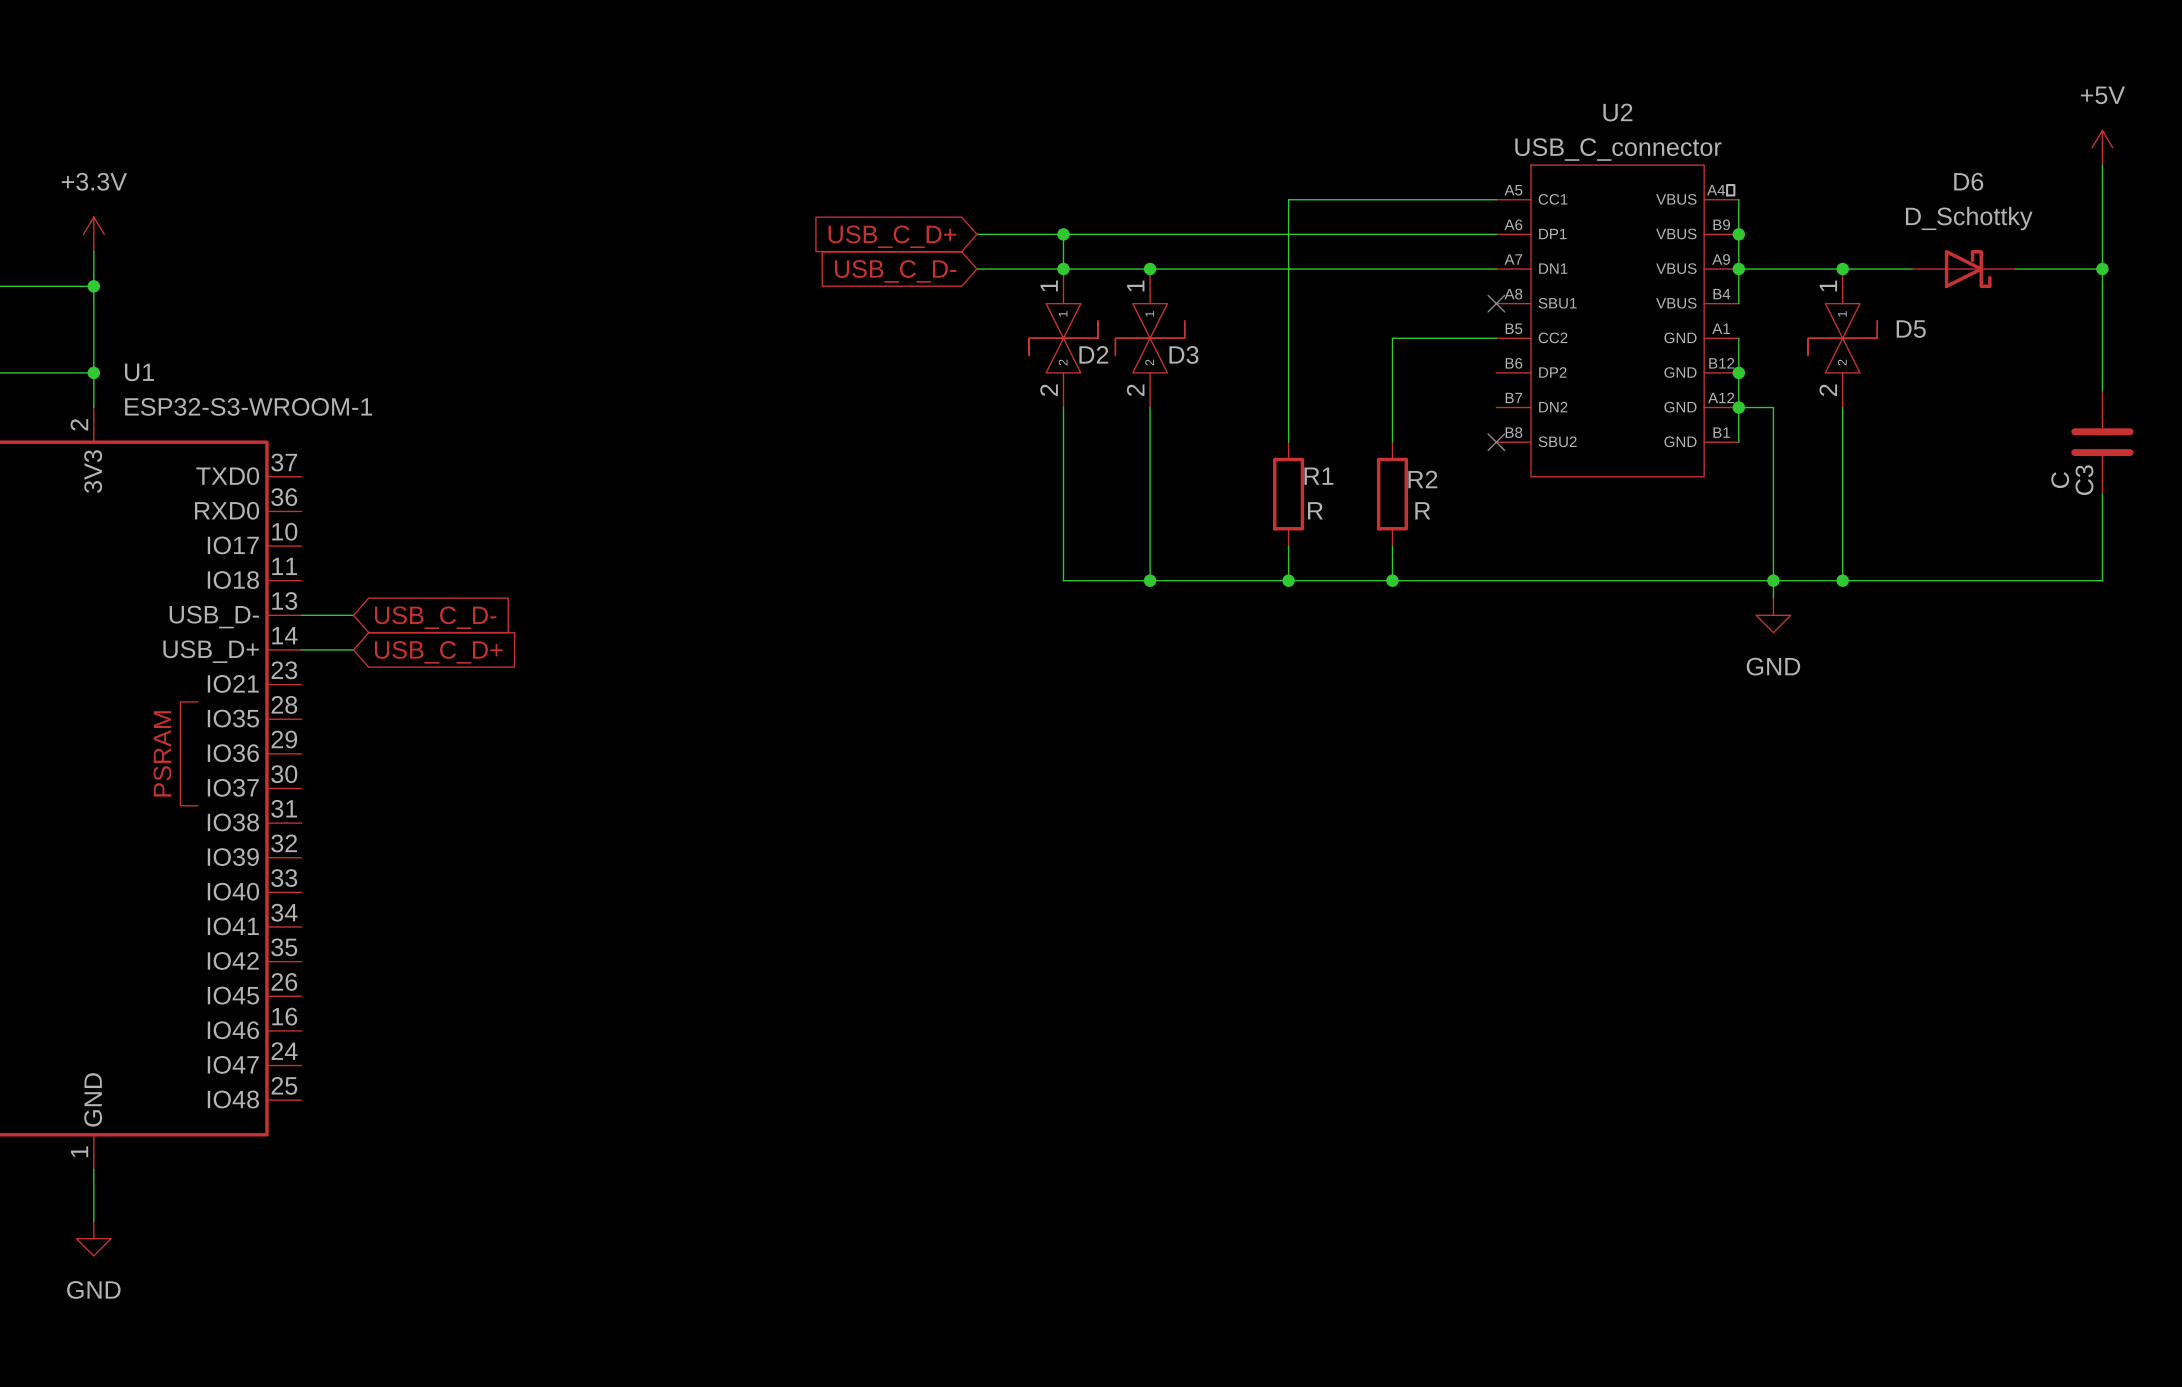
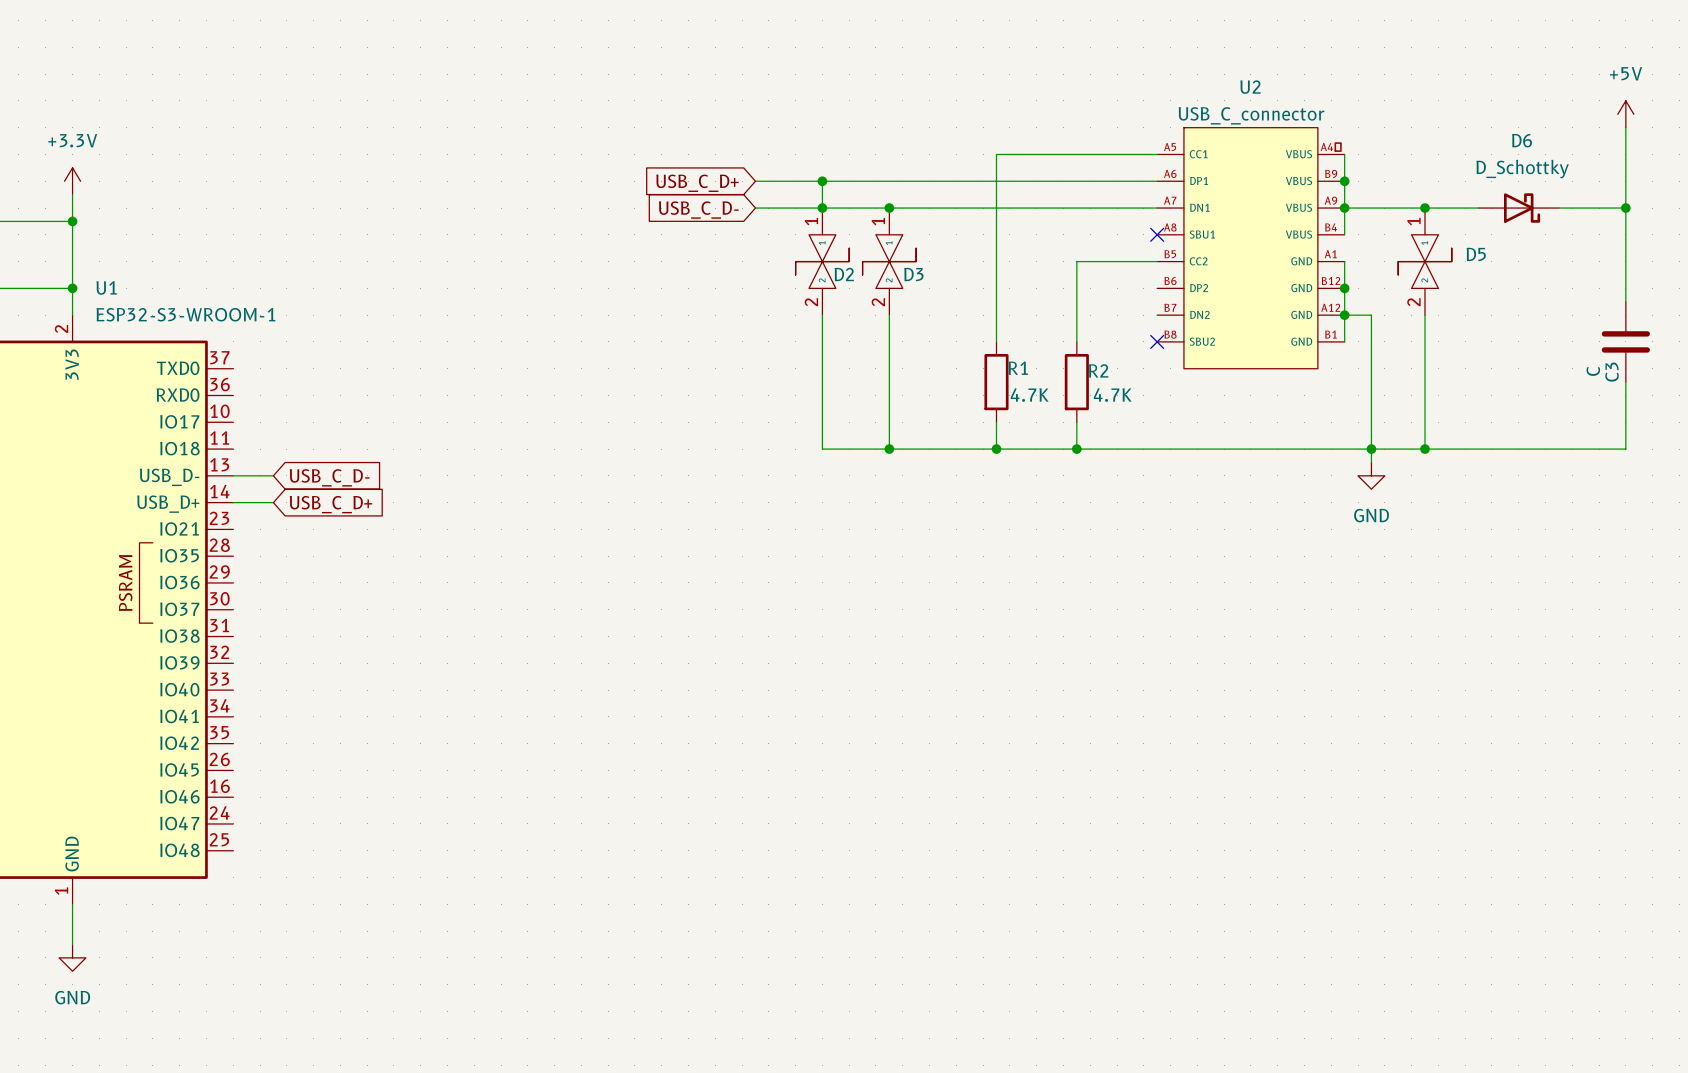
R1 value: R (1315, 510) -> 4.7K (1029, 395)
R2 value: R (1422, 510) -> 4.7K (1112, 395)

